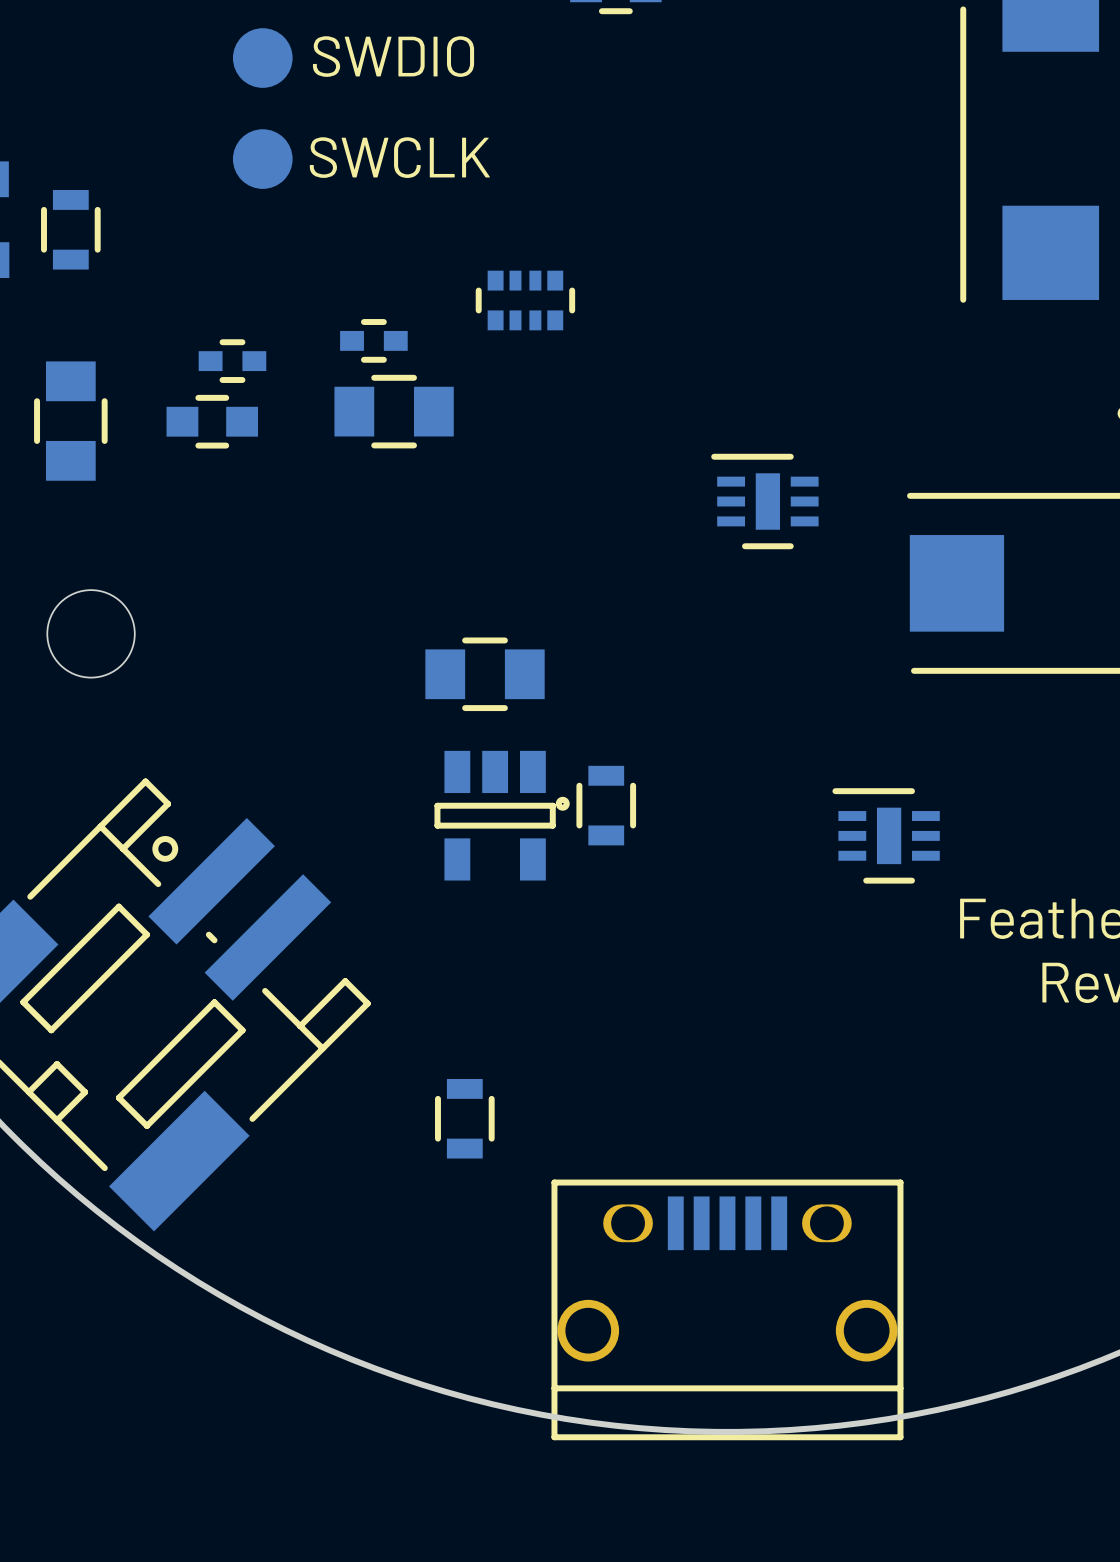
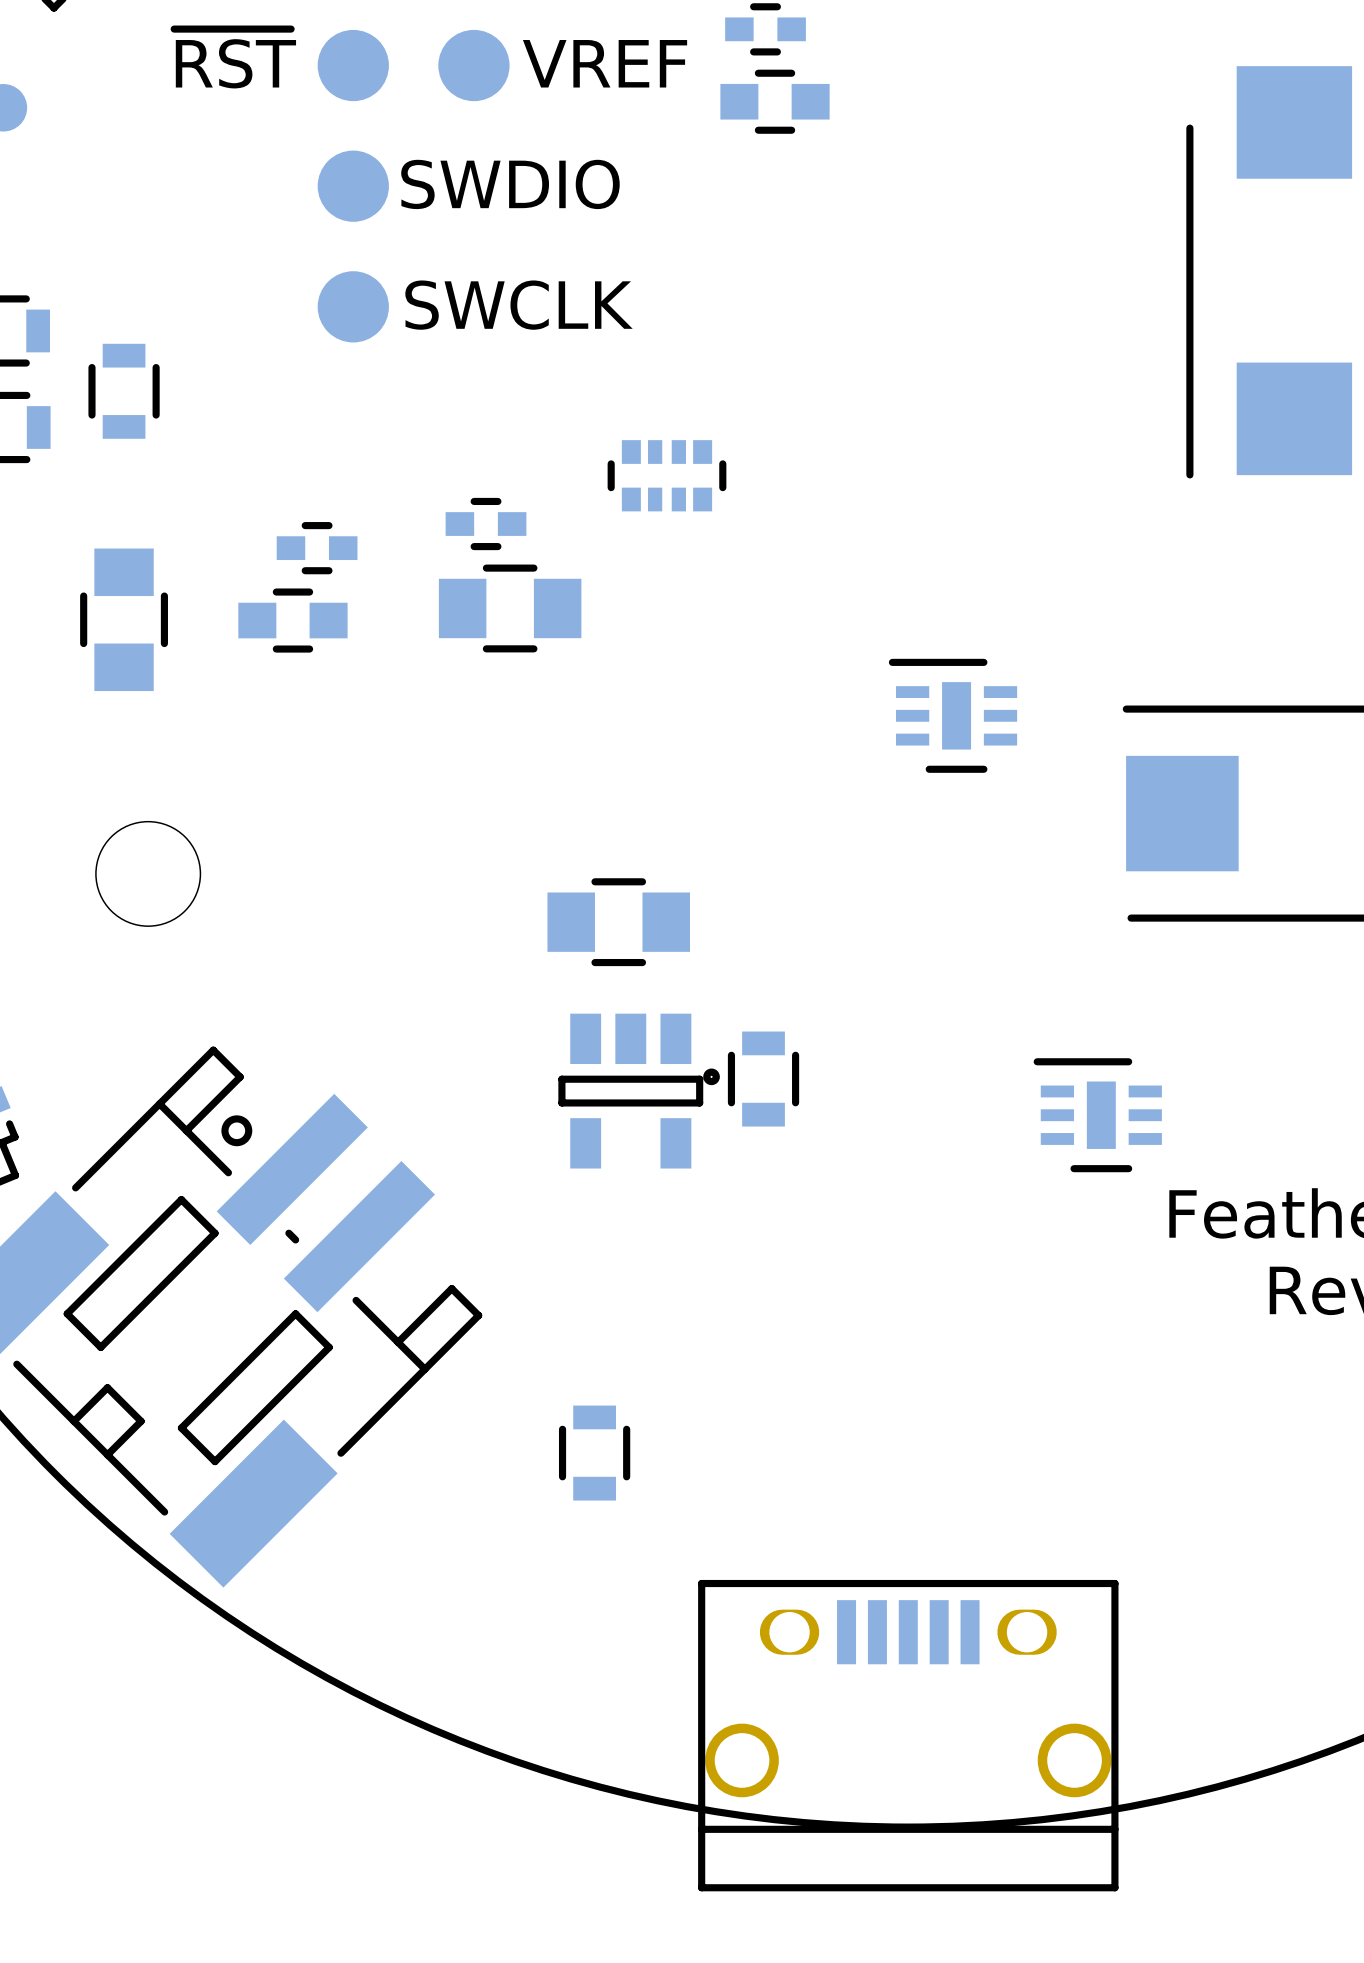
part position: (727, 1309) -> (908, 1735)

